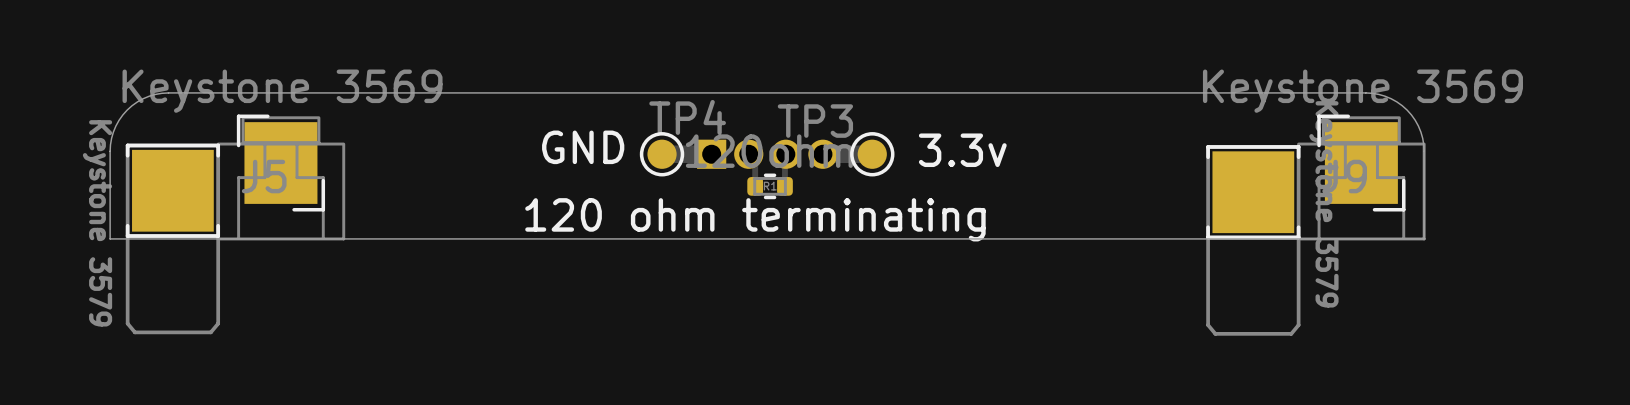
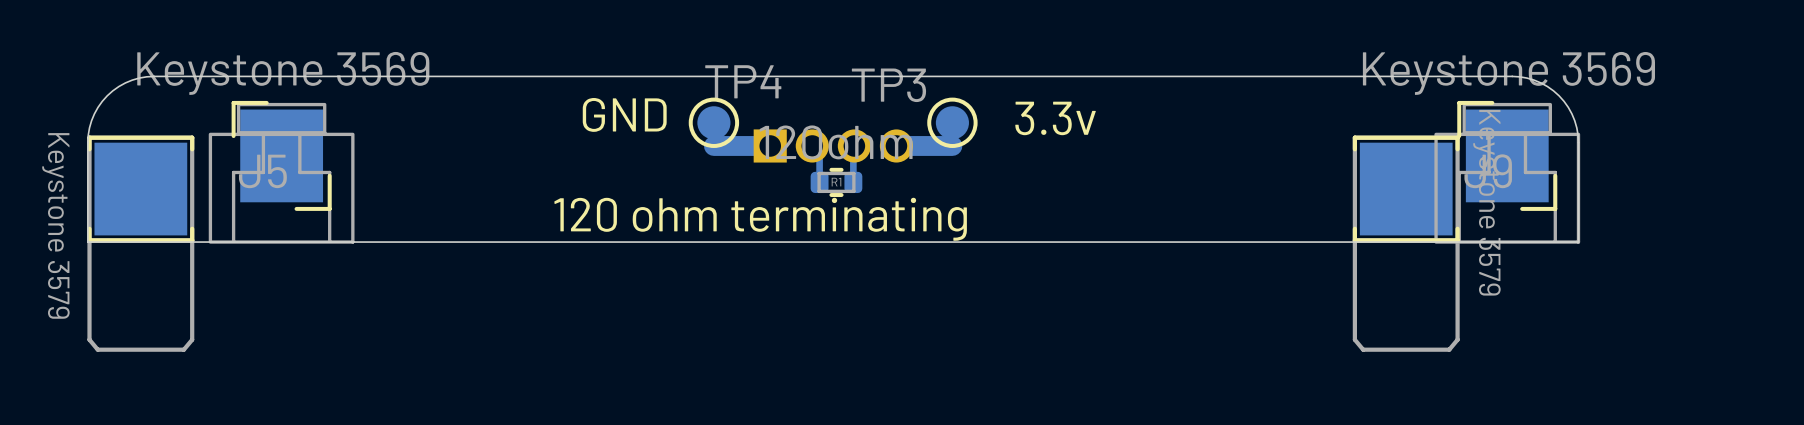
TP4 position: (662, 154) -> (713, 122)
TP3 position: (872, 154) -> (952, 122)
part position: (172, 238) -> (140, 243)
part position: (1253, 240) -> (1406, 243)

